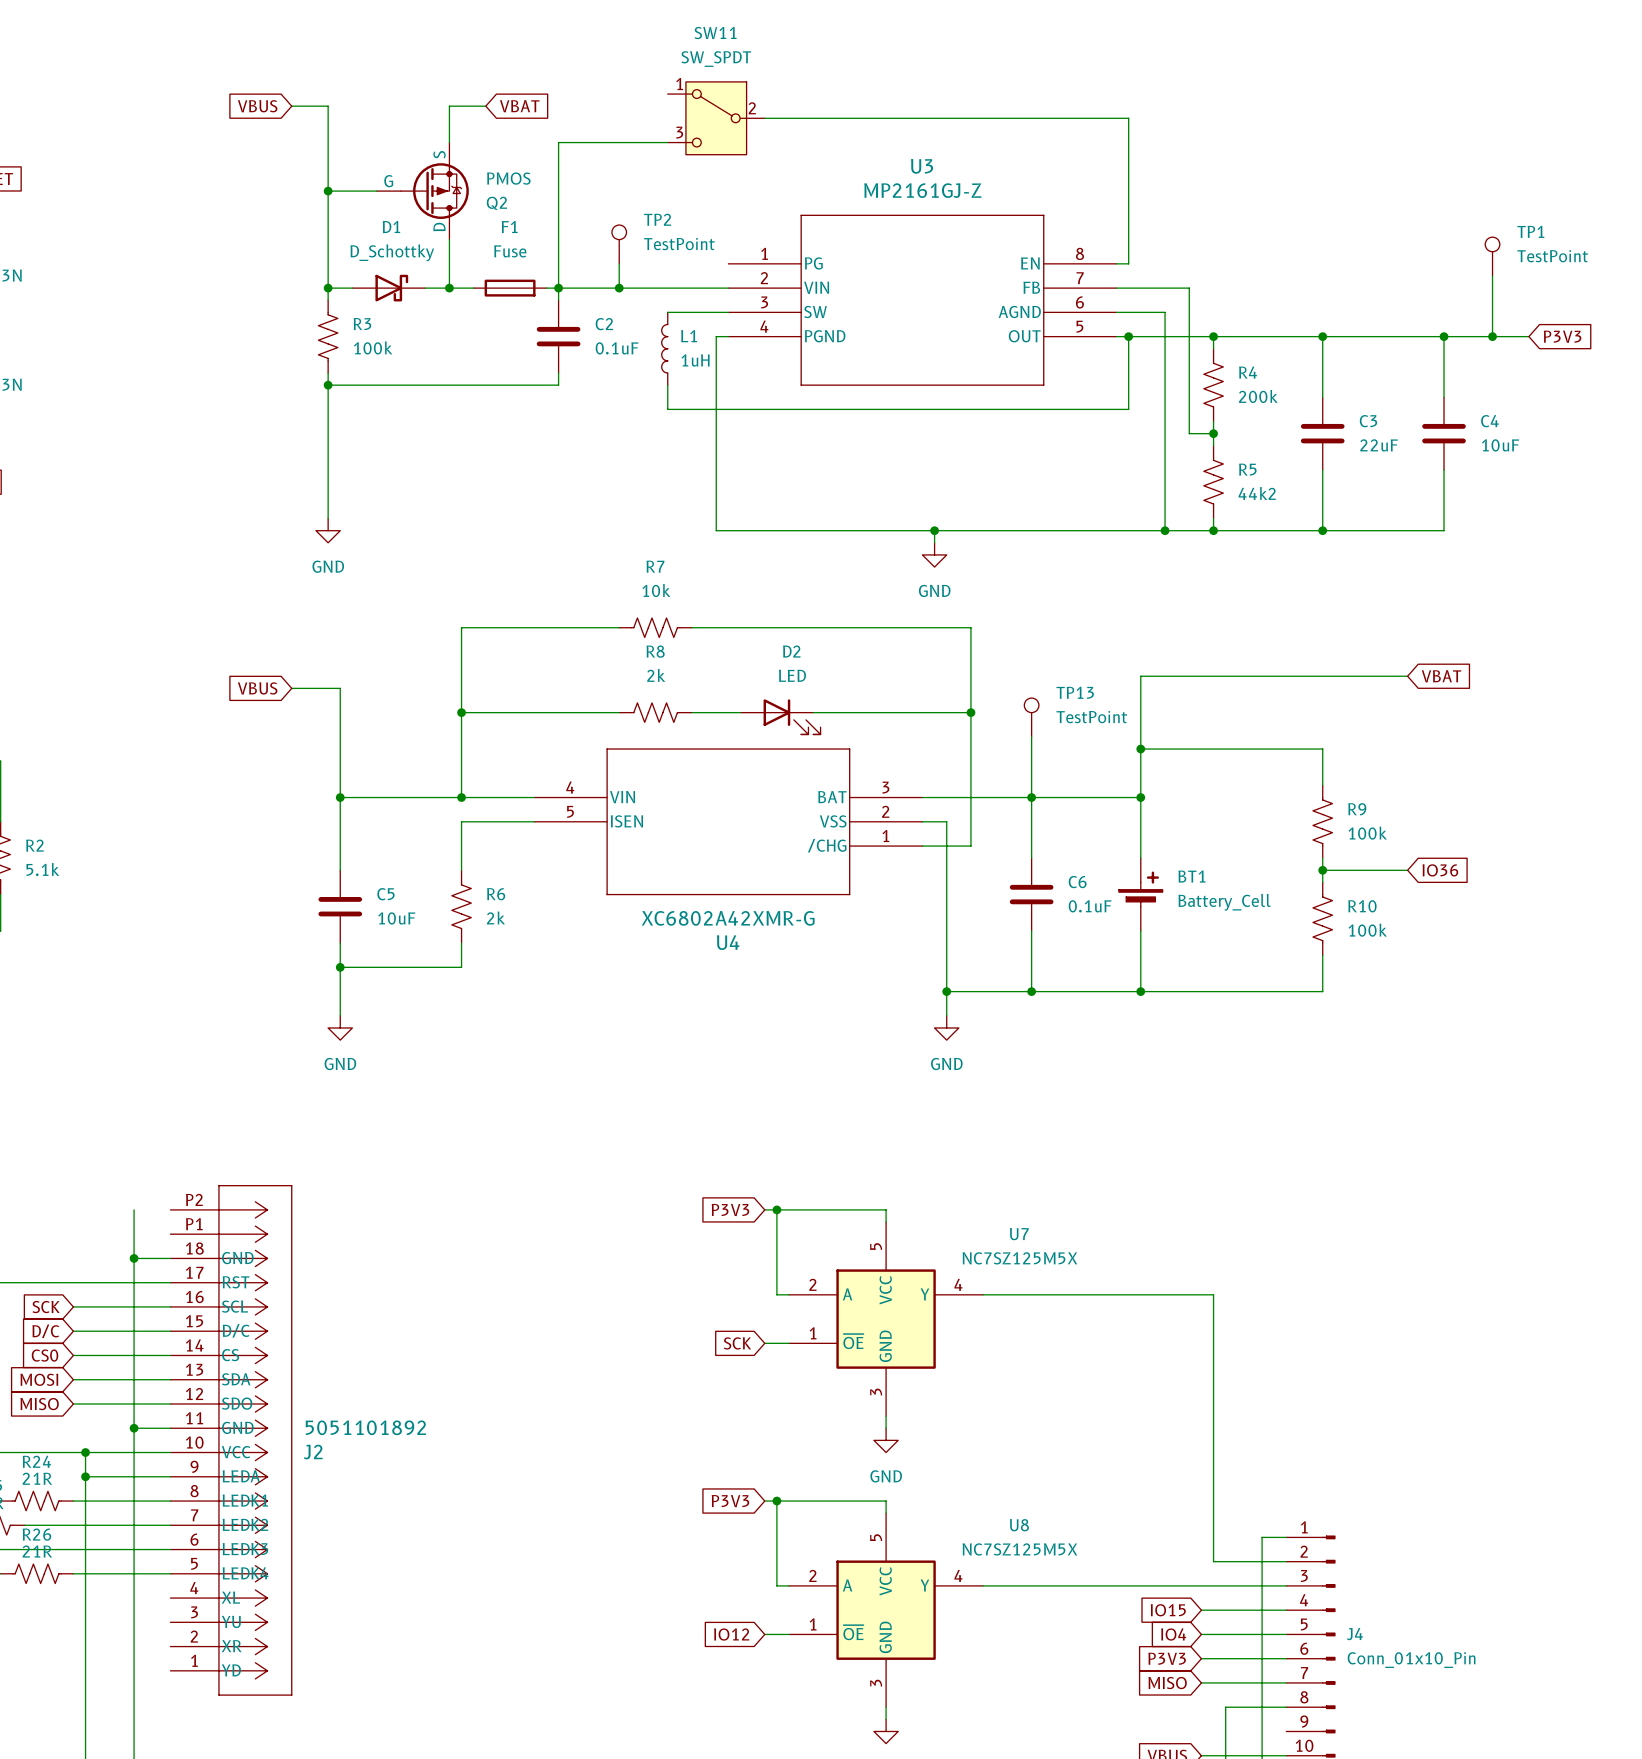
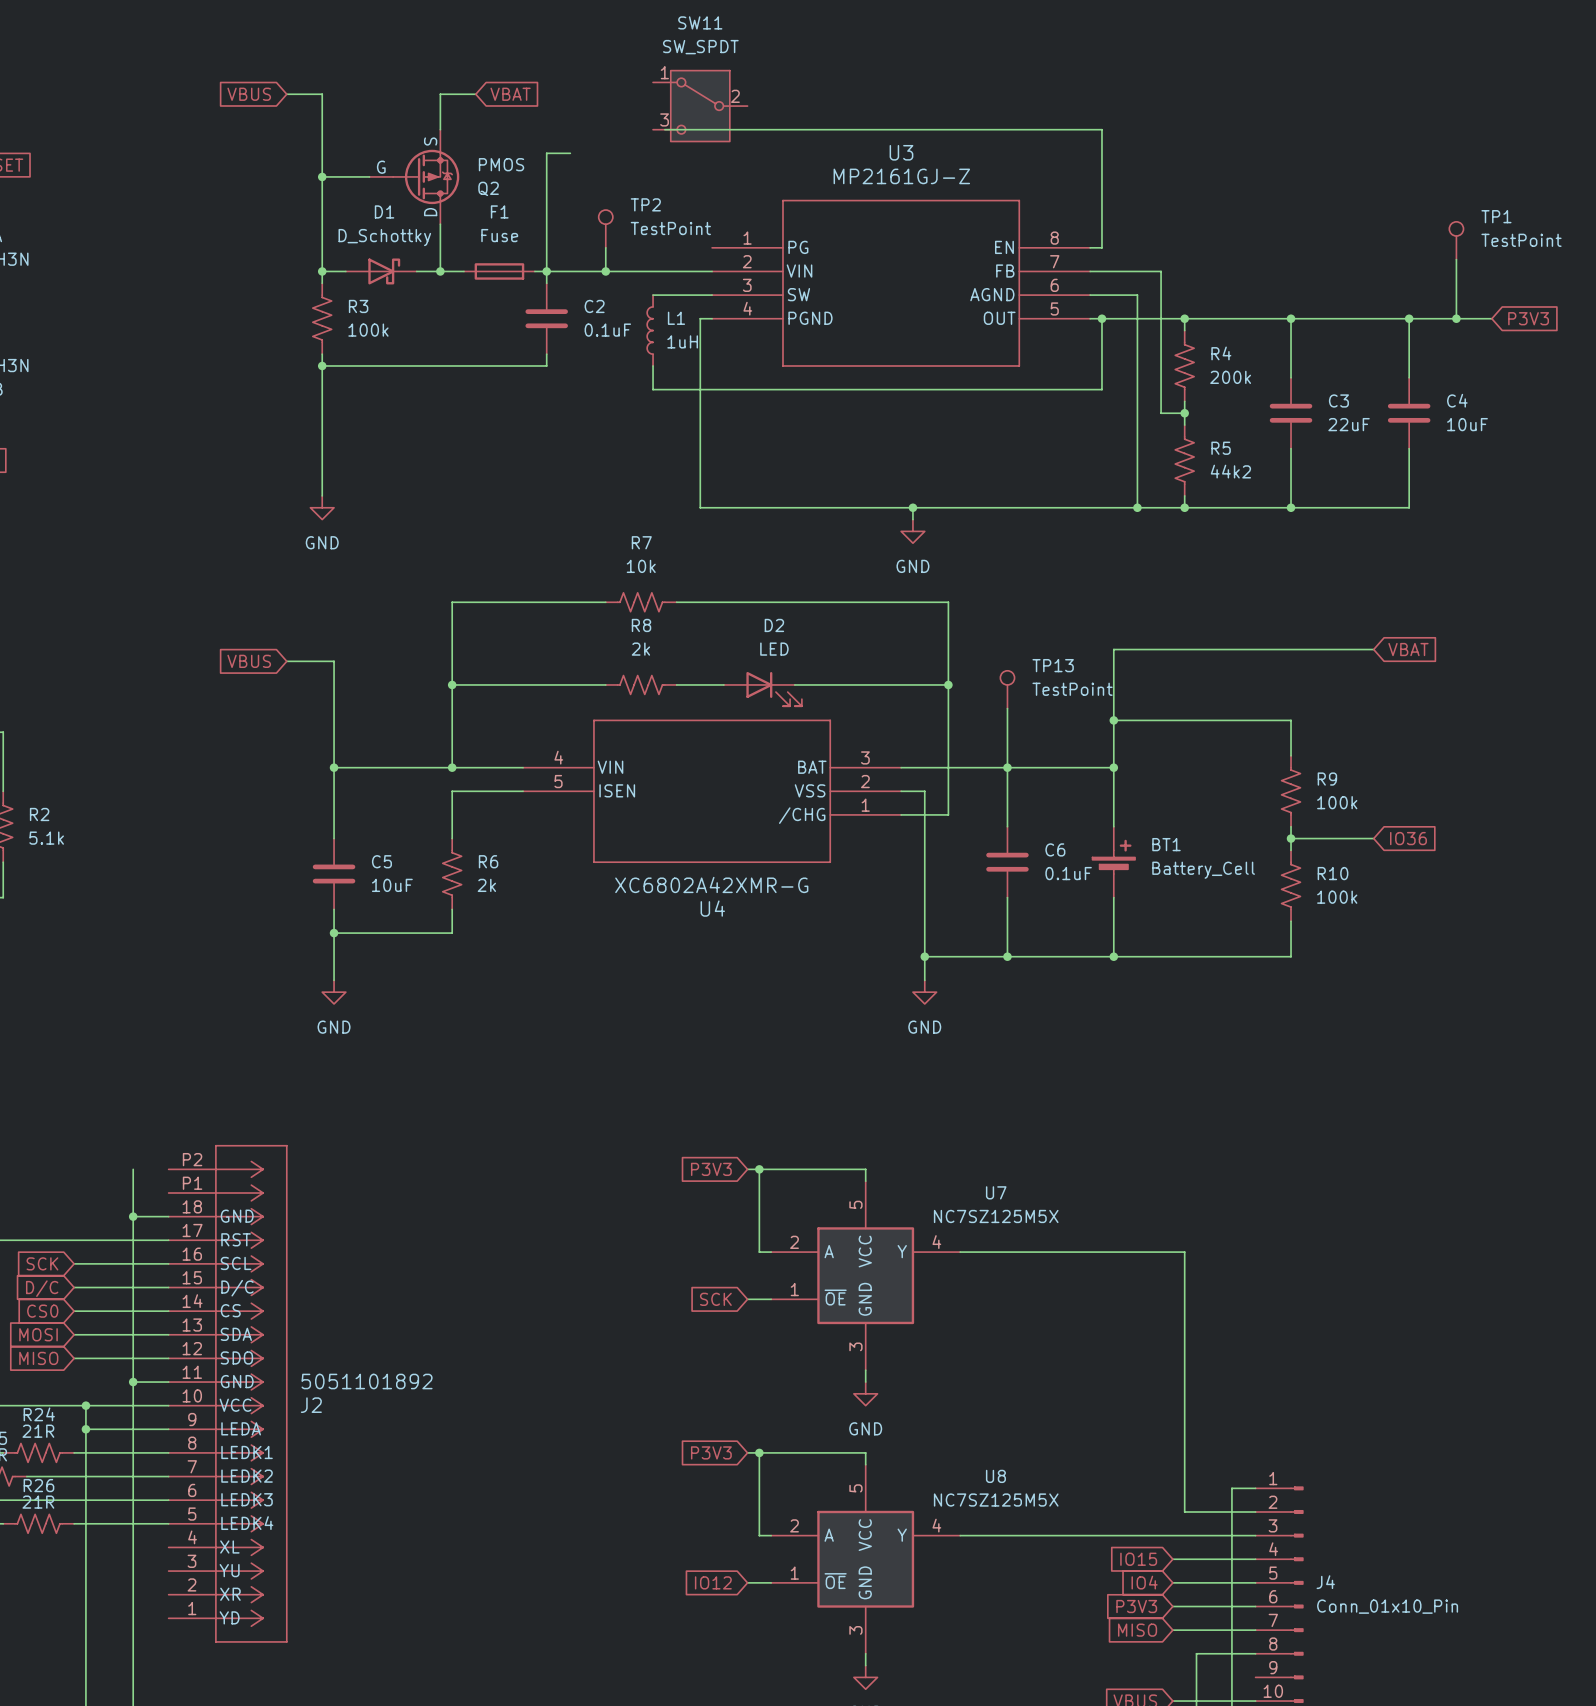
wire: (764, 118) (1128, 118) (1128, 142) -> (664, 129) (1101, 129)
wire: (667, 142) (558, 142) (558, 166) -> (570, 153) (546, 153)

